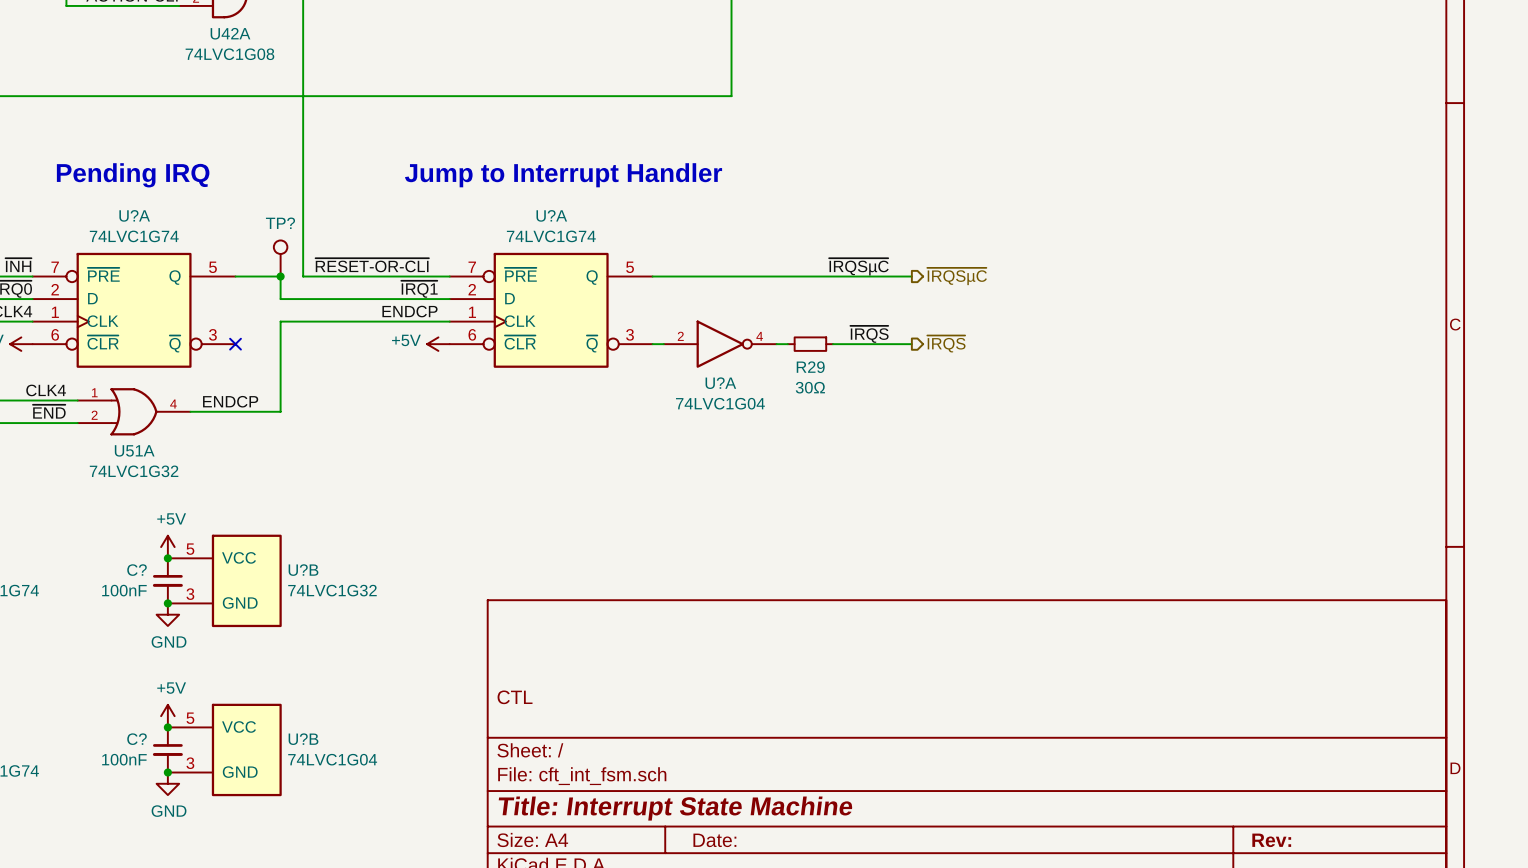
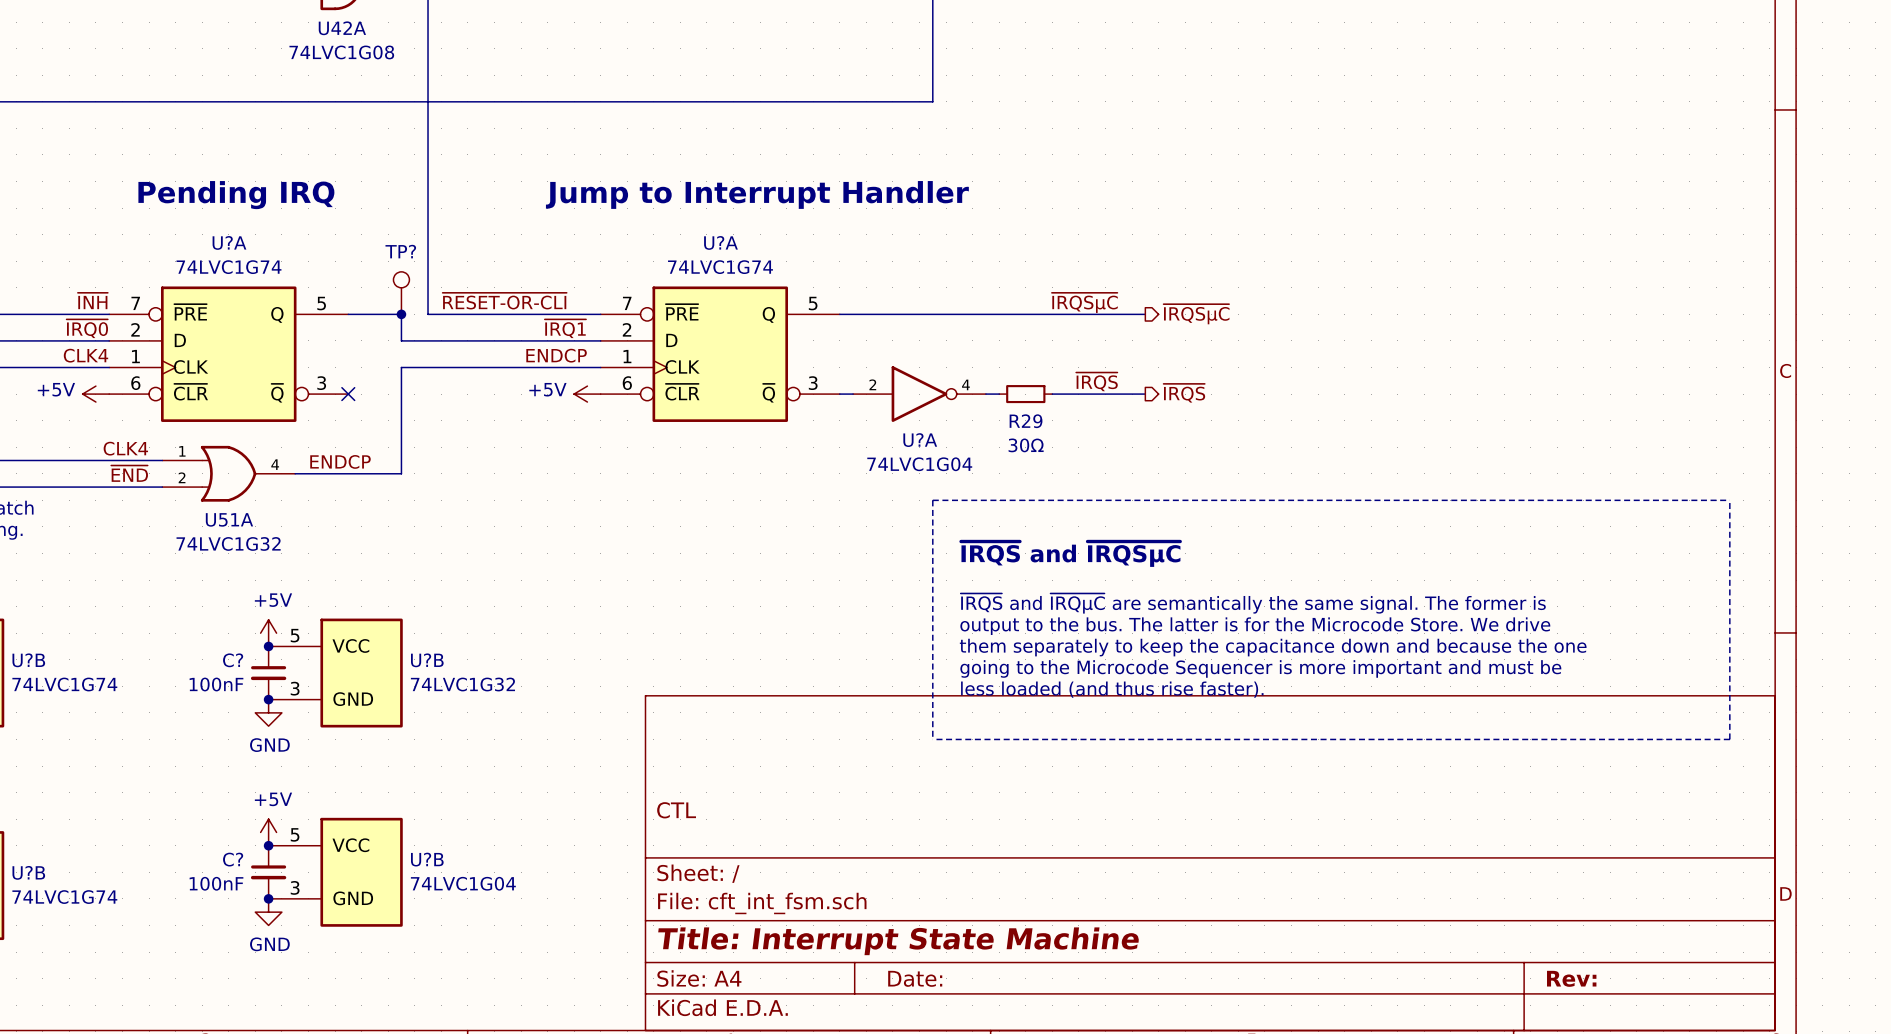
line: none -> (932, 500) (1729, 500) (1729, 739) (932, 739) (932, 500)
text: none -> ~{IRQS} and ~{IRQSµC} (1070, 554)
text: none -> ~{IRQS} and ~{IRQµC} are semantically the same signal. The former is (1253, 603)
text: none -> output to the bus. The latter is for the Microcode Store. We drive (1255, 626)
text: none -> them separately to keep the capacitance down and because the one (1273, 647)
text: none -> going to the Microcode Sequencer is more important and must be (1260, 668)
text: none -> less loaded (and thus rise faster). (1112, 689)

